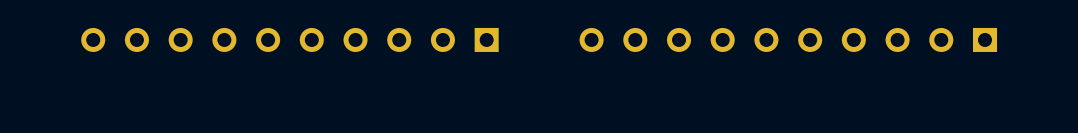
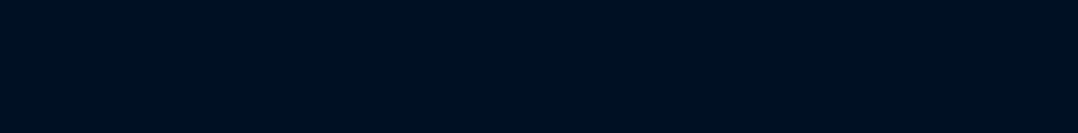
part: (289, 39) -> none
part: (788, 39) -> none

